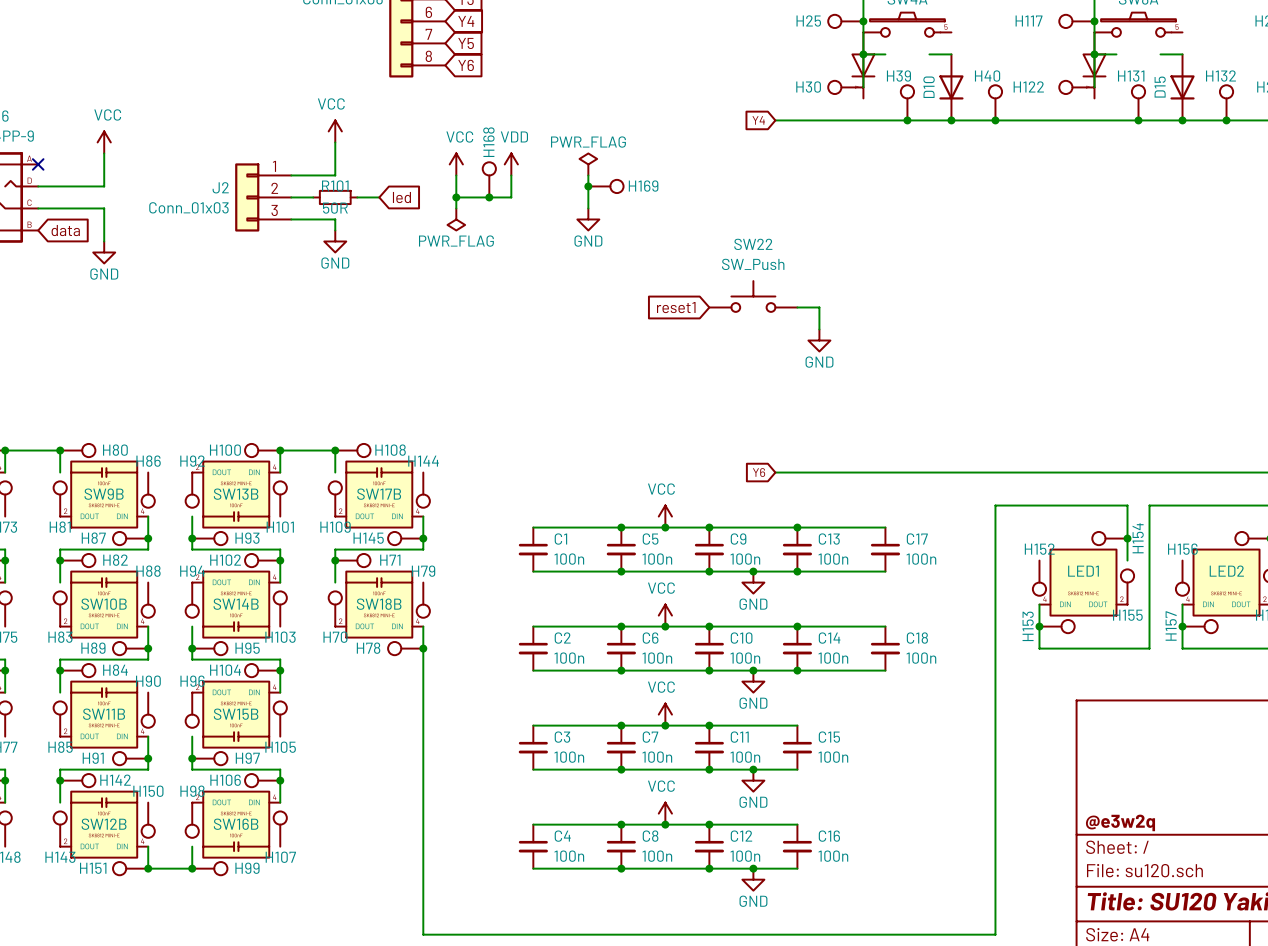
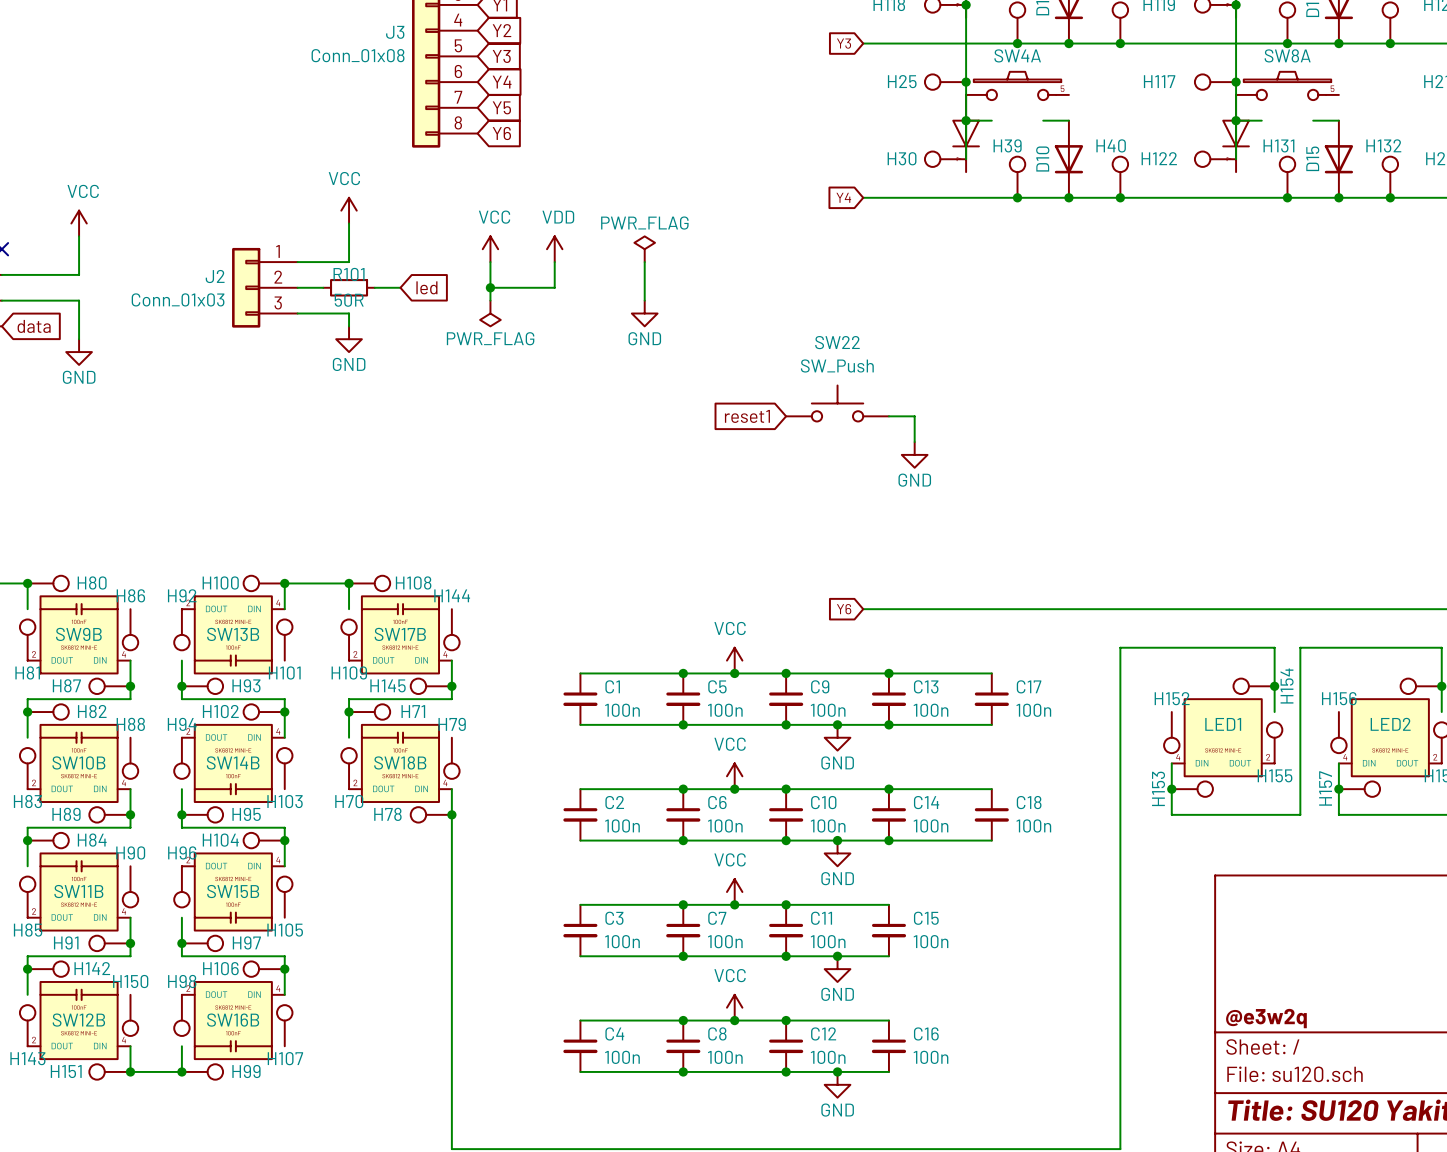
H168: (489, 179) -> none
junction: (588, 186) -> none
H169: (605, 186) -> none
junction: (489, 197) -> none

